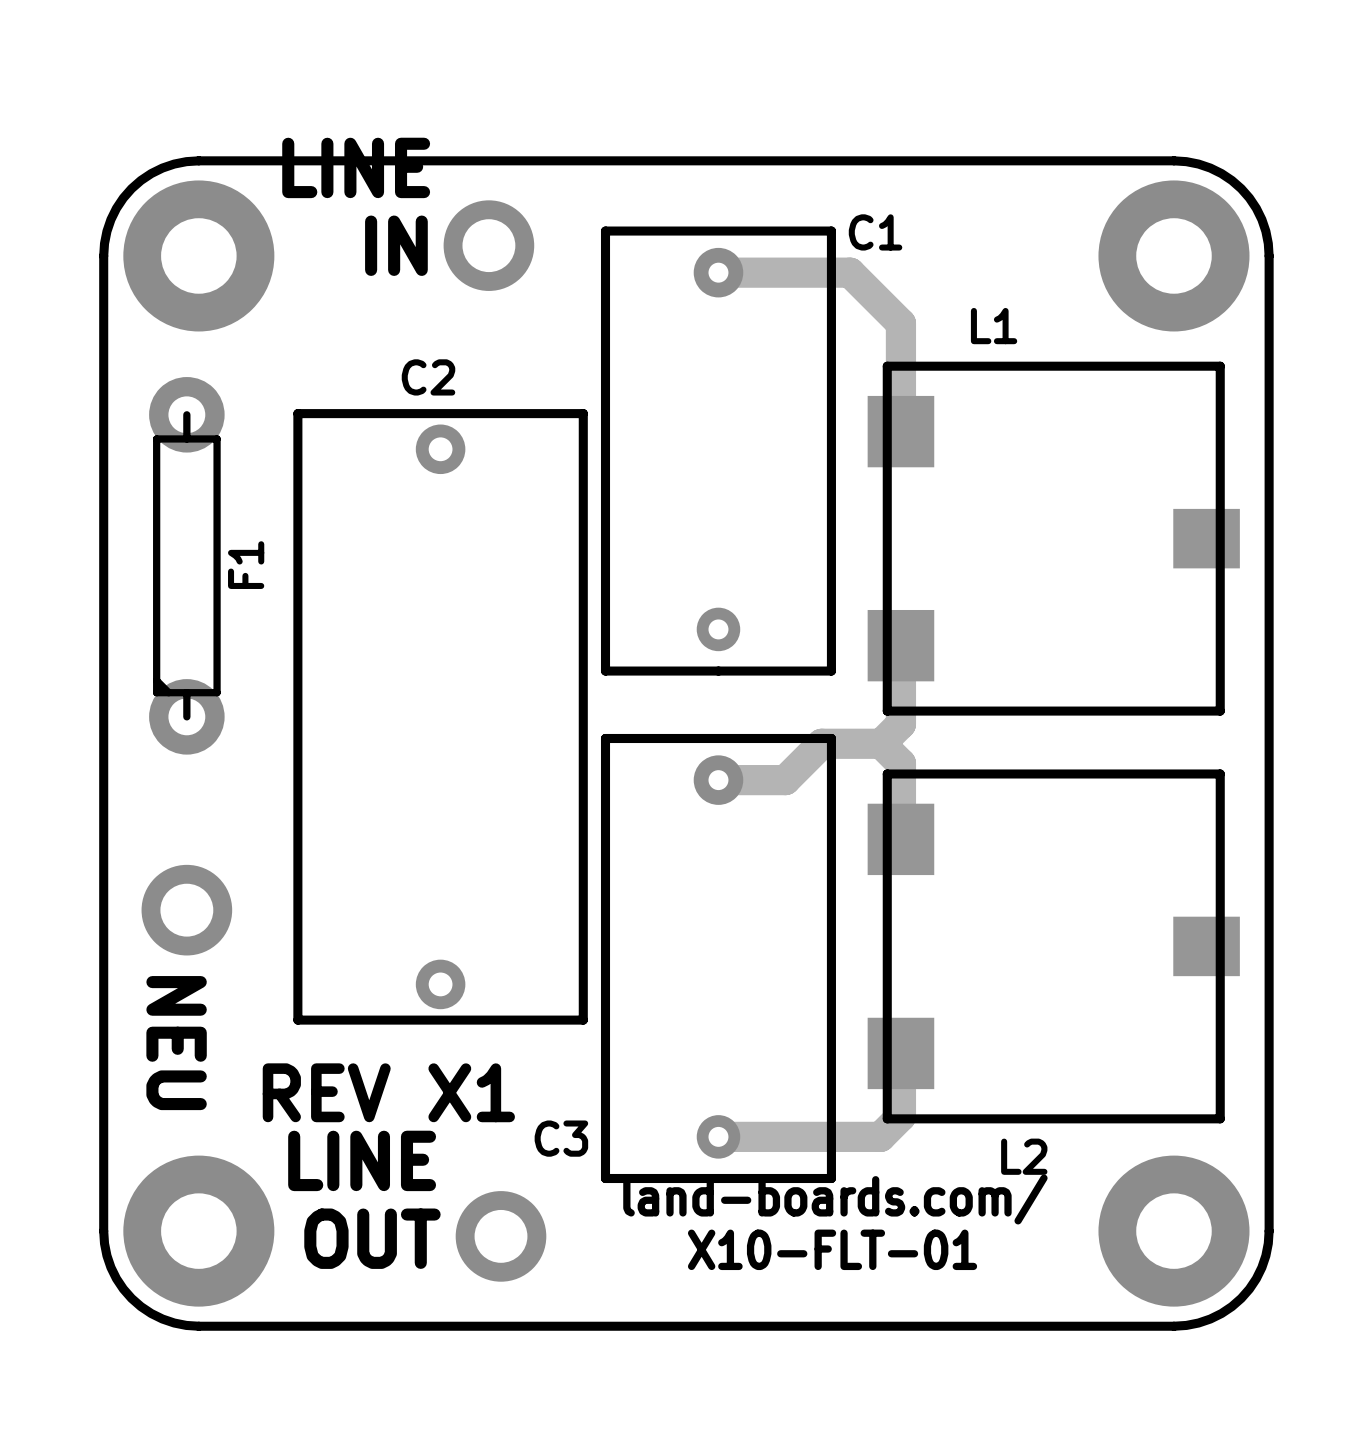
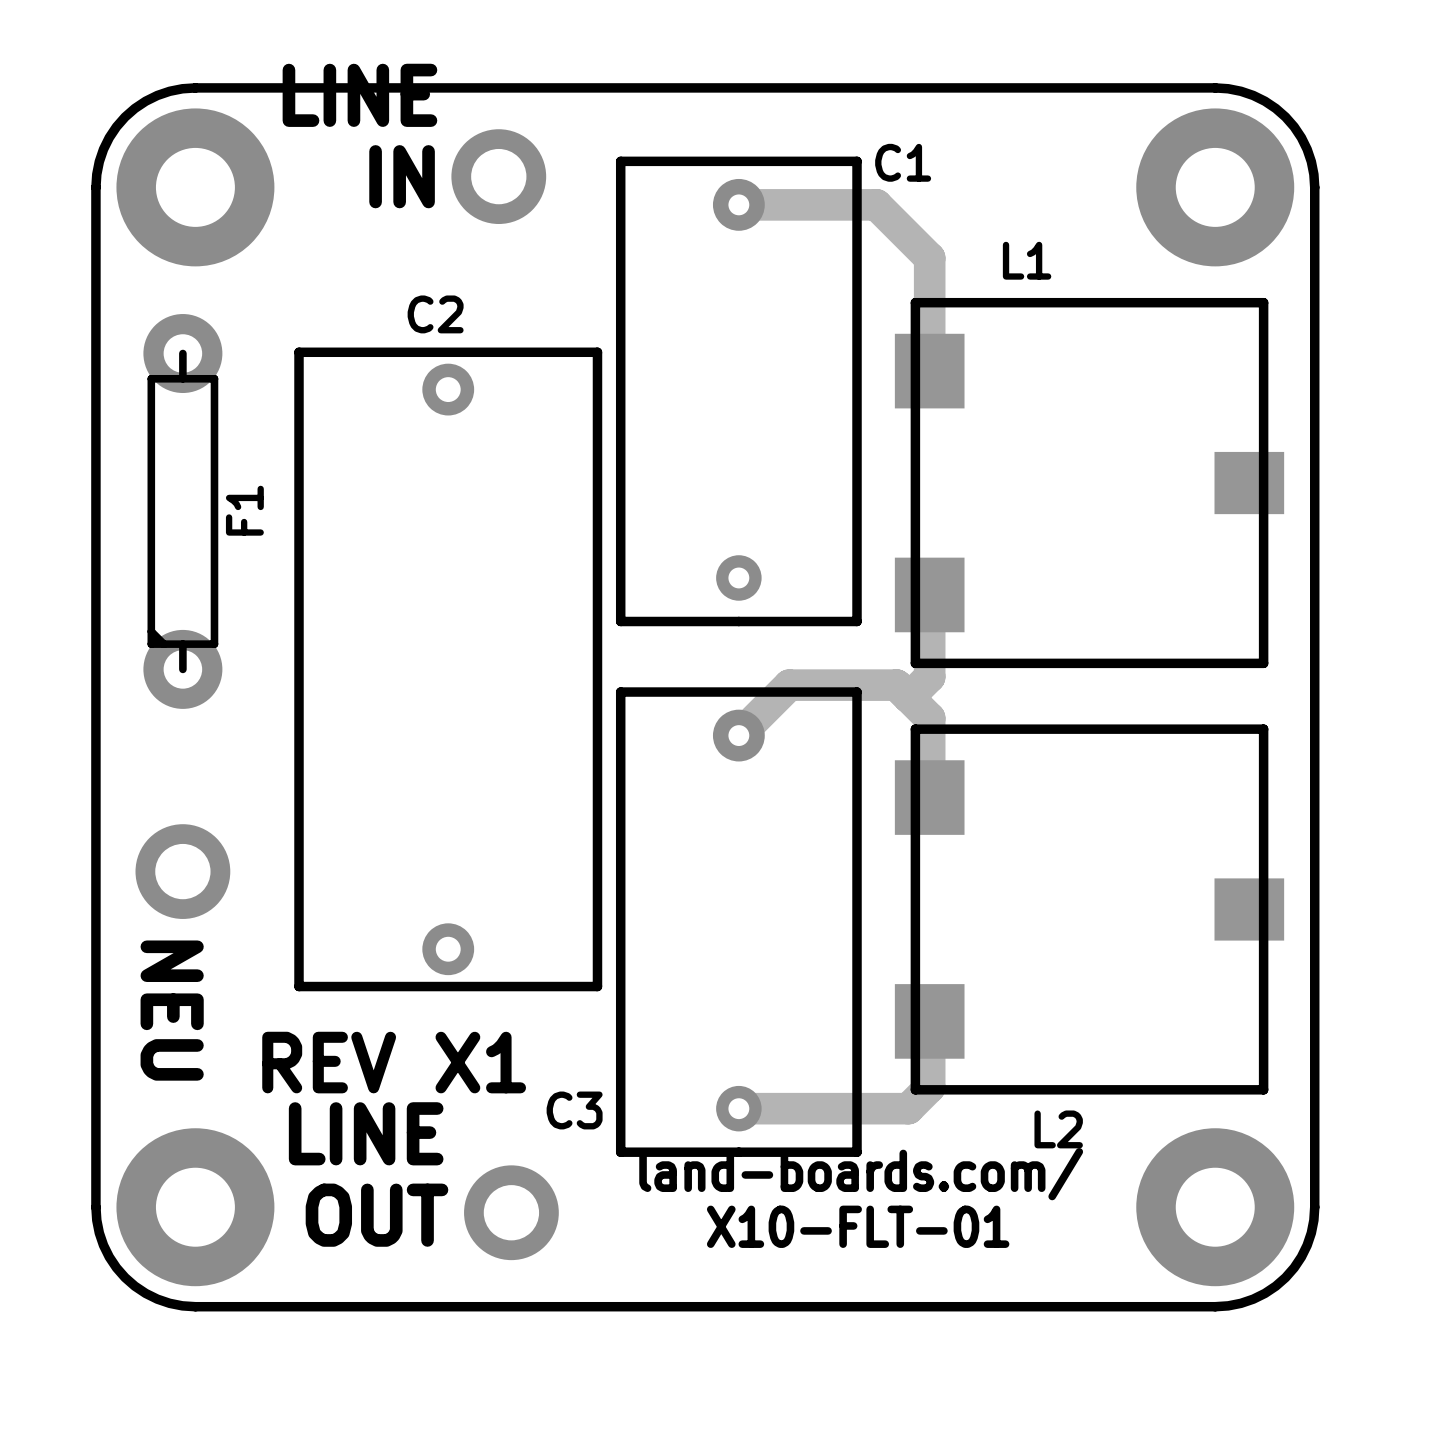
track: (881, 743) (821, 743) (785, 780) (718, 780) -> (909, 697) (896, 685) (789, 685) (738, 735)

